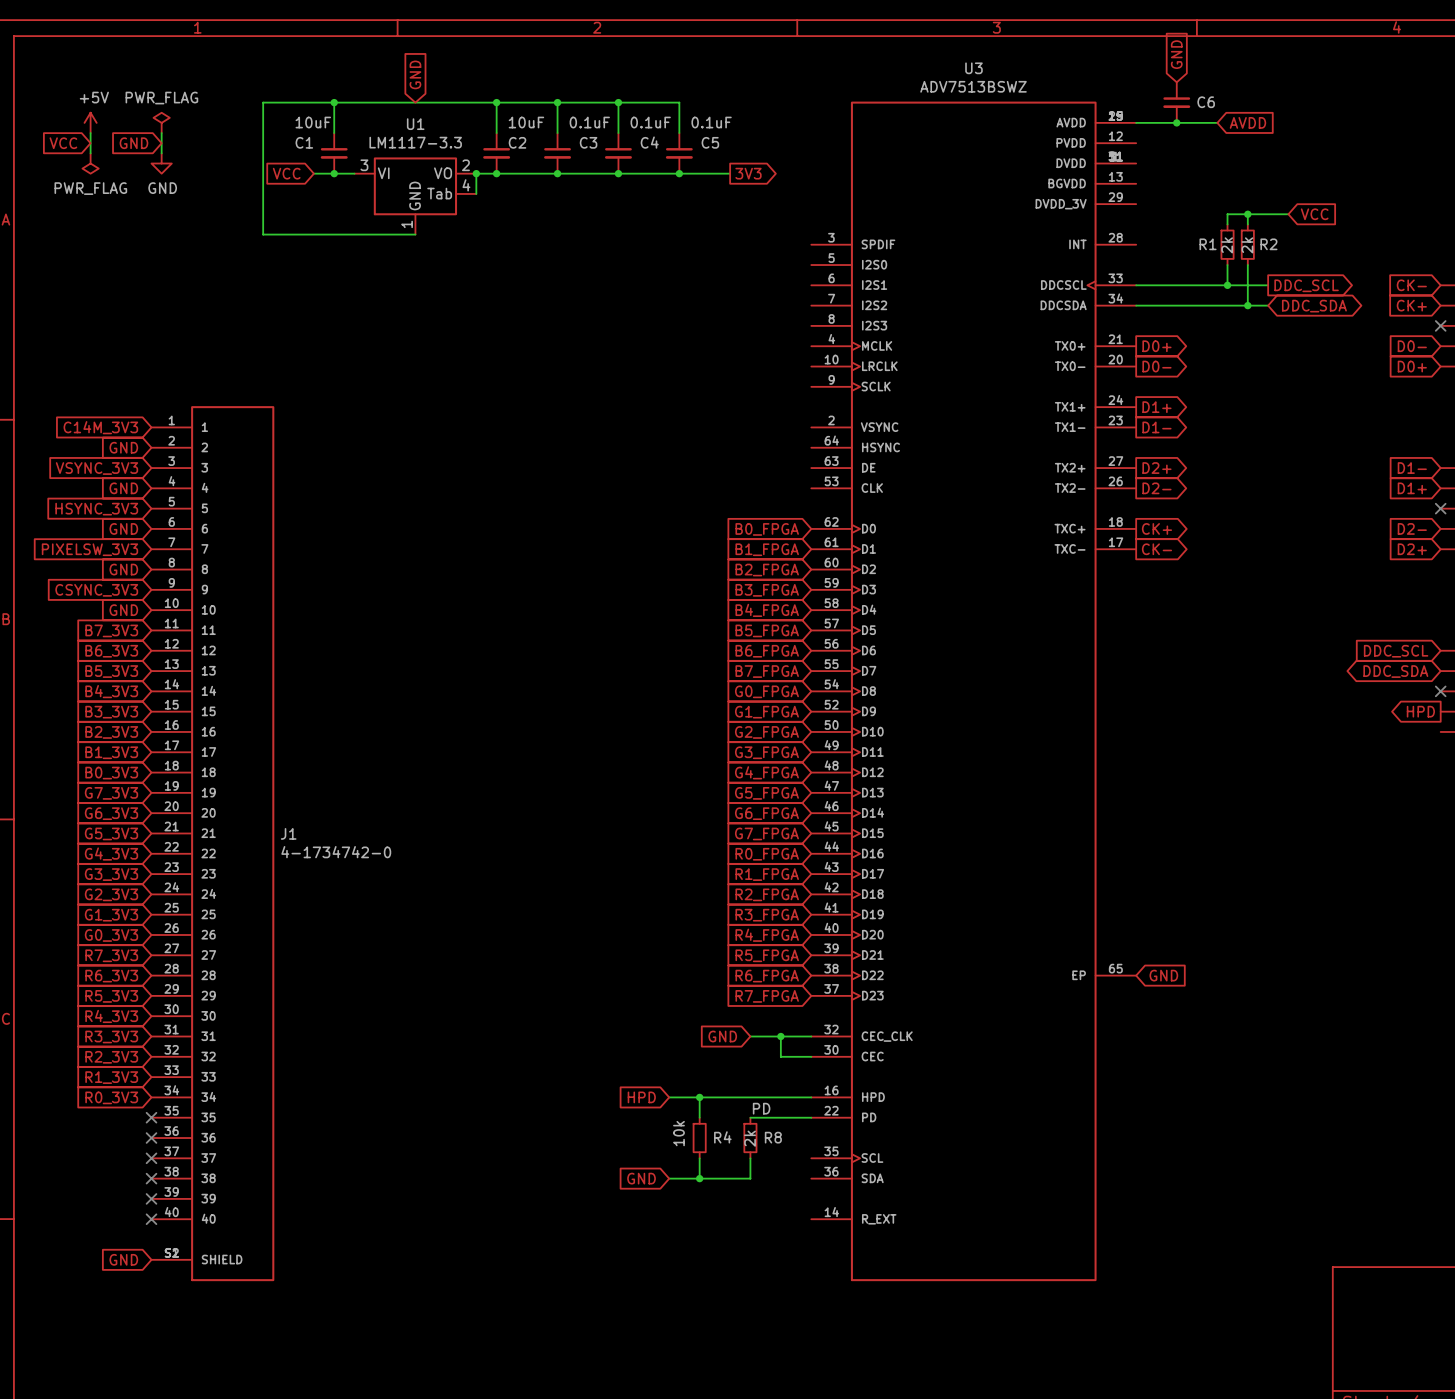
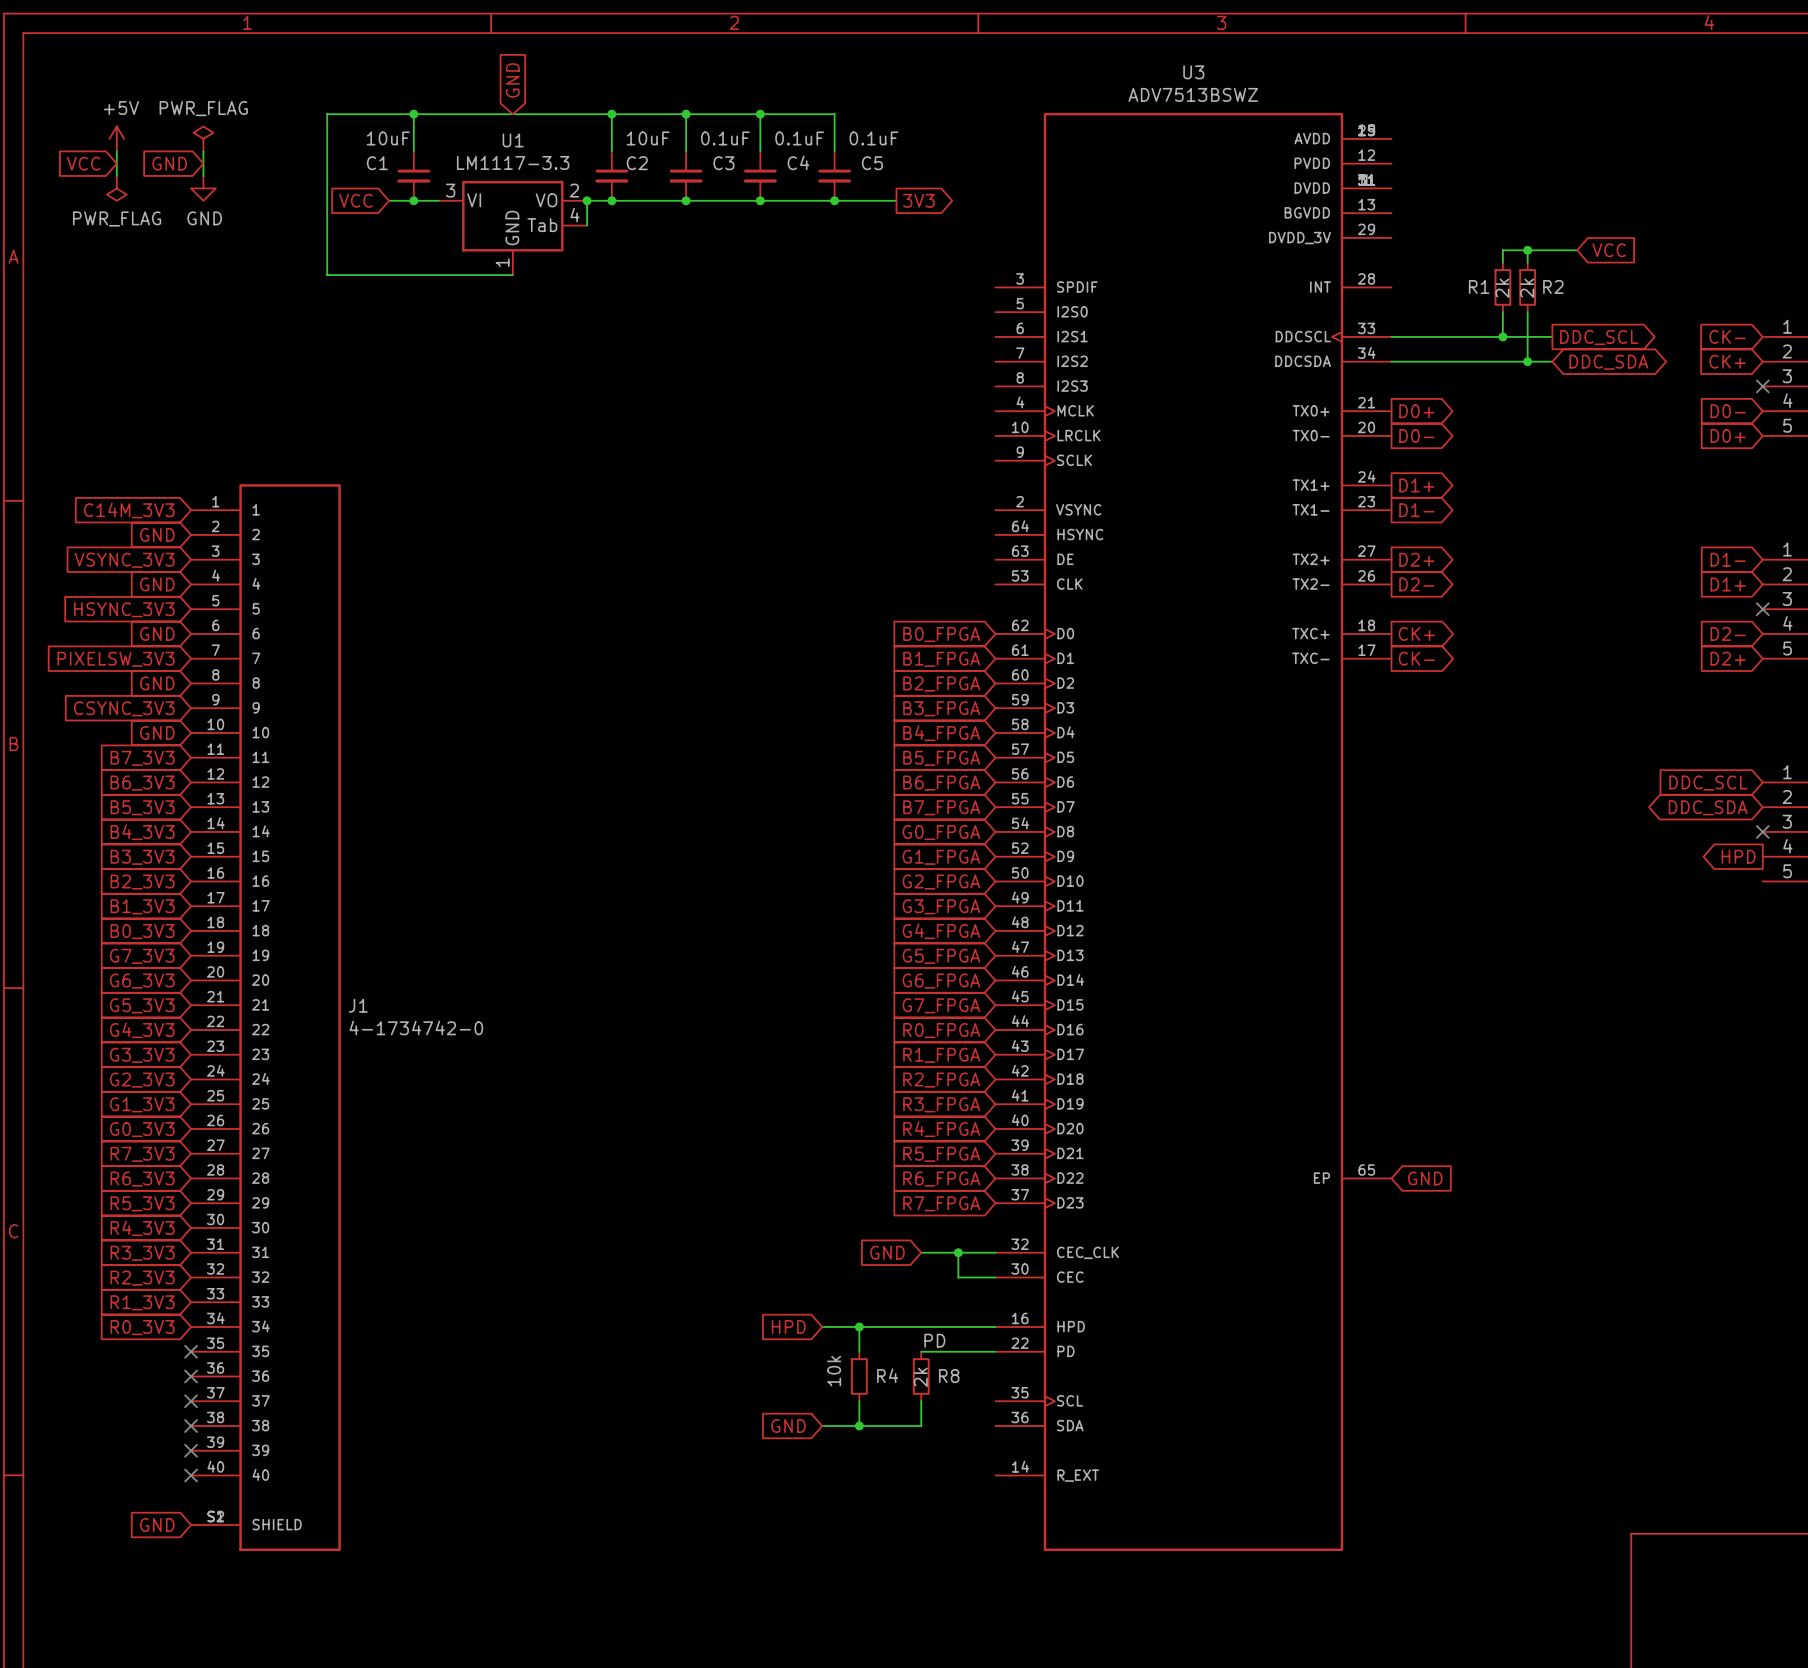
global label: GND (1176, 54) -> none
C6: (1176, 102) -> none
wire: (1136, 122) (1217, 122) -> none
junction: (1176, 122) -> none
global label: AVDD (1247, 122) -> none

